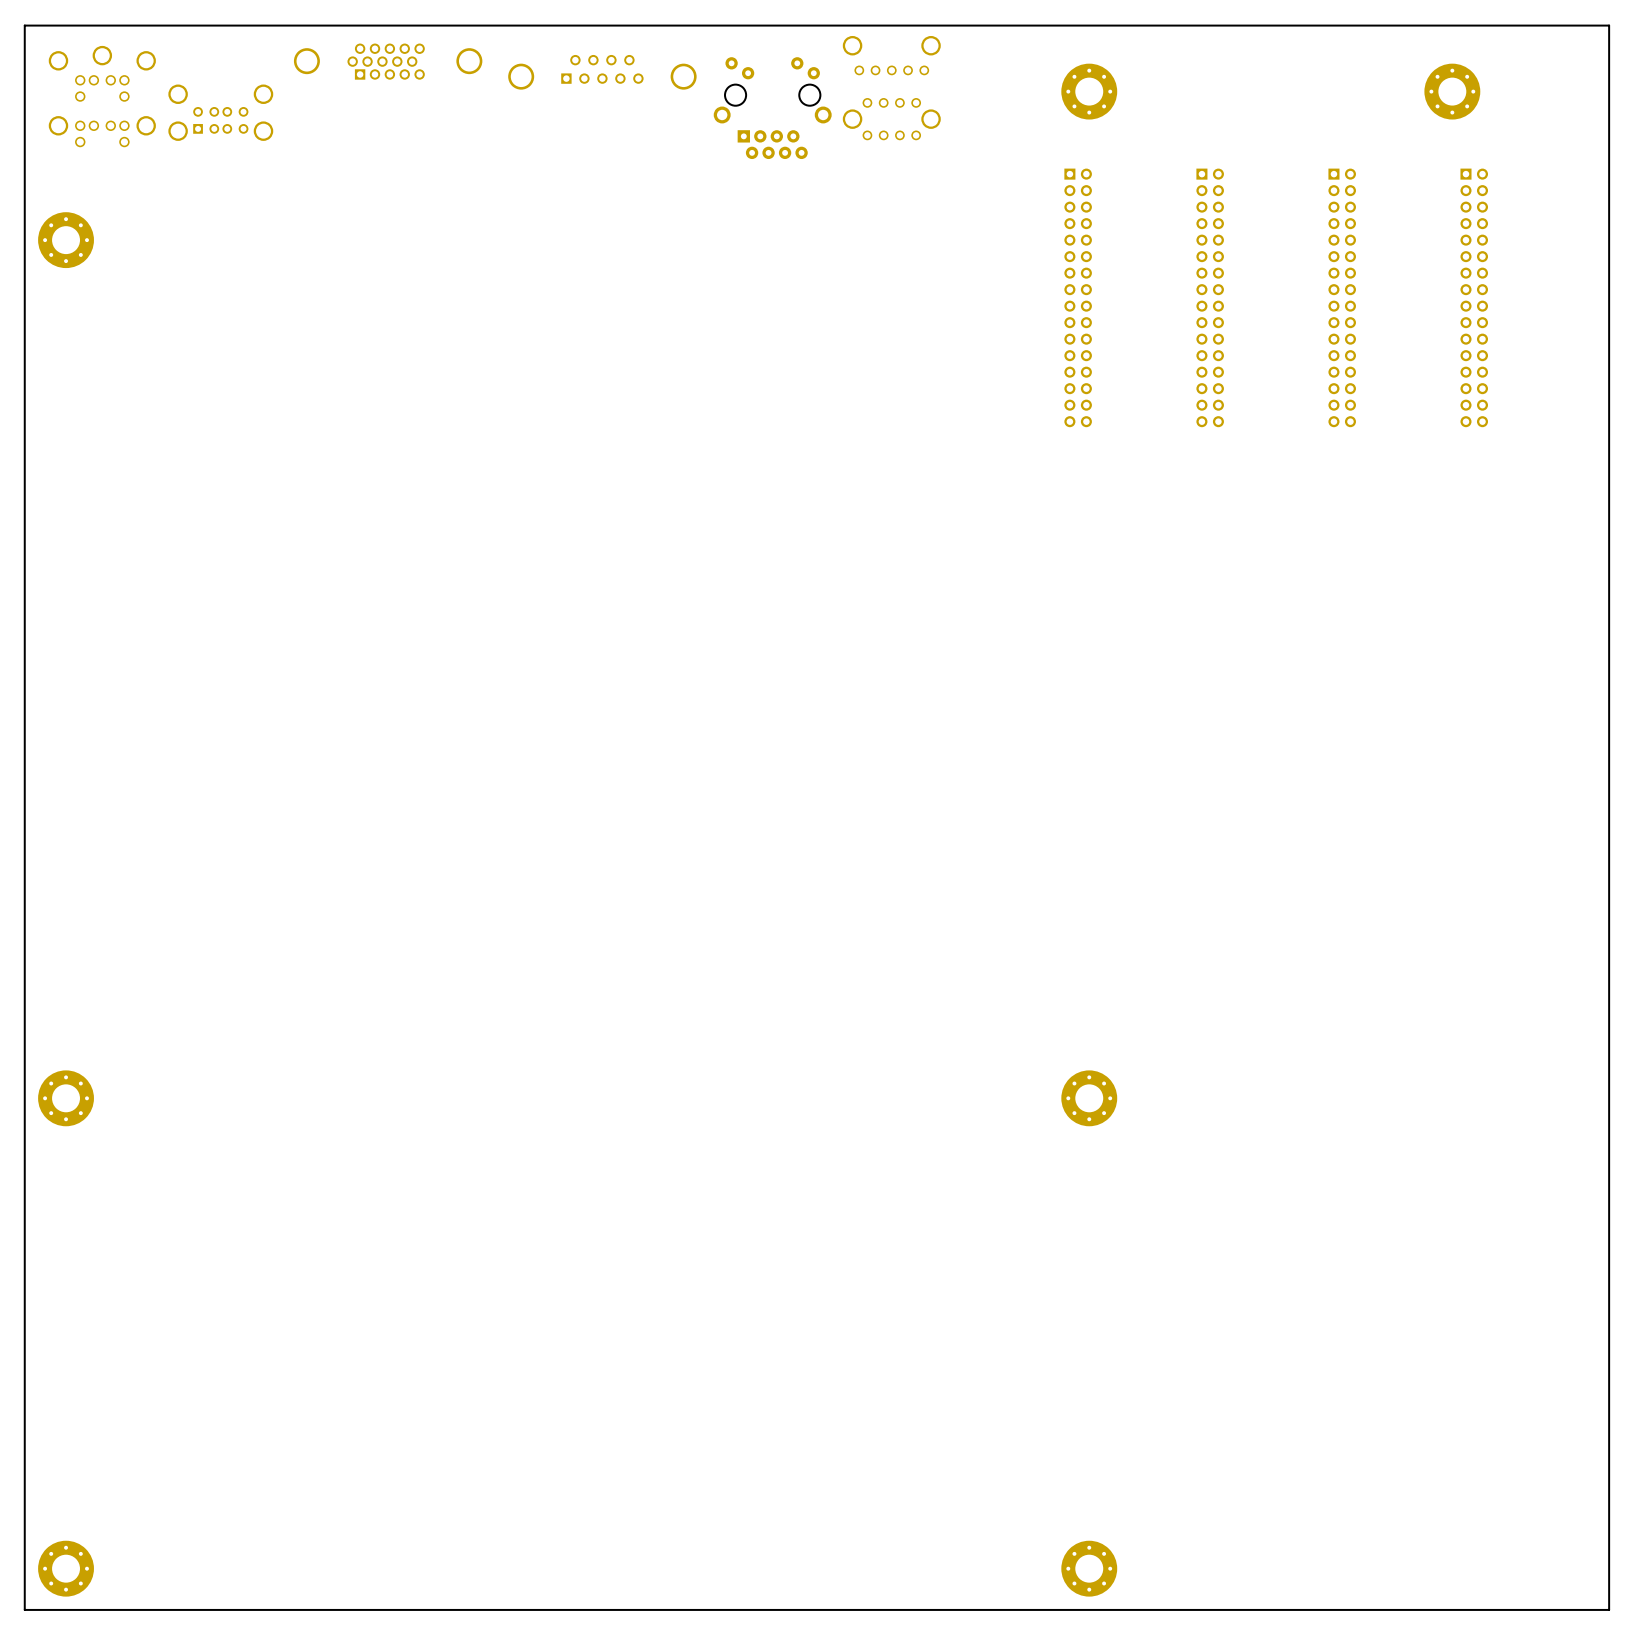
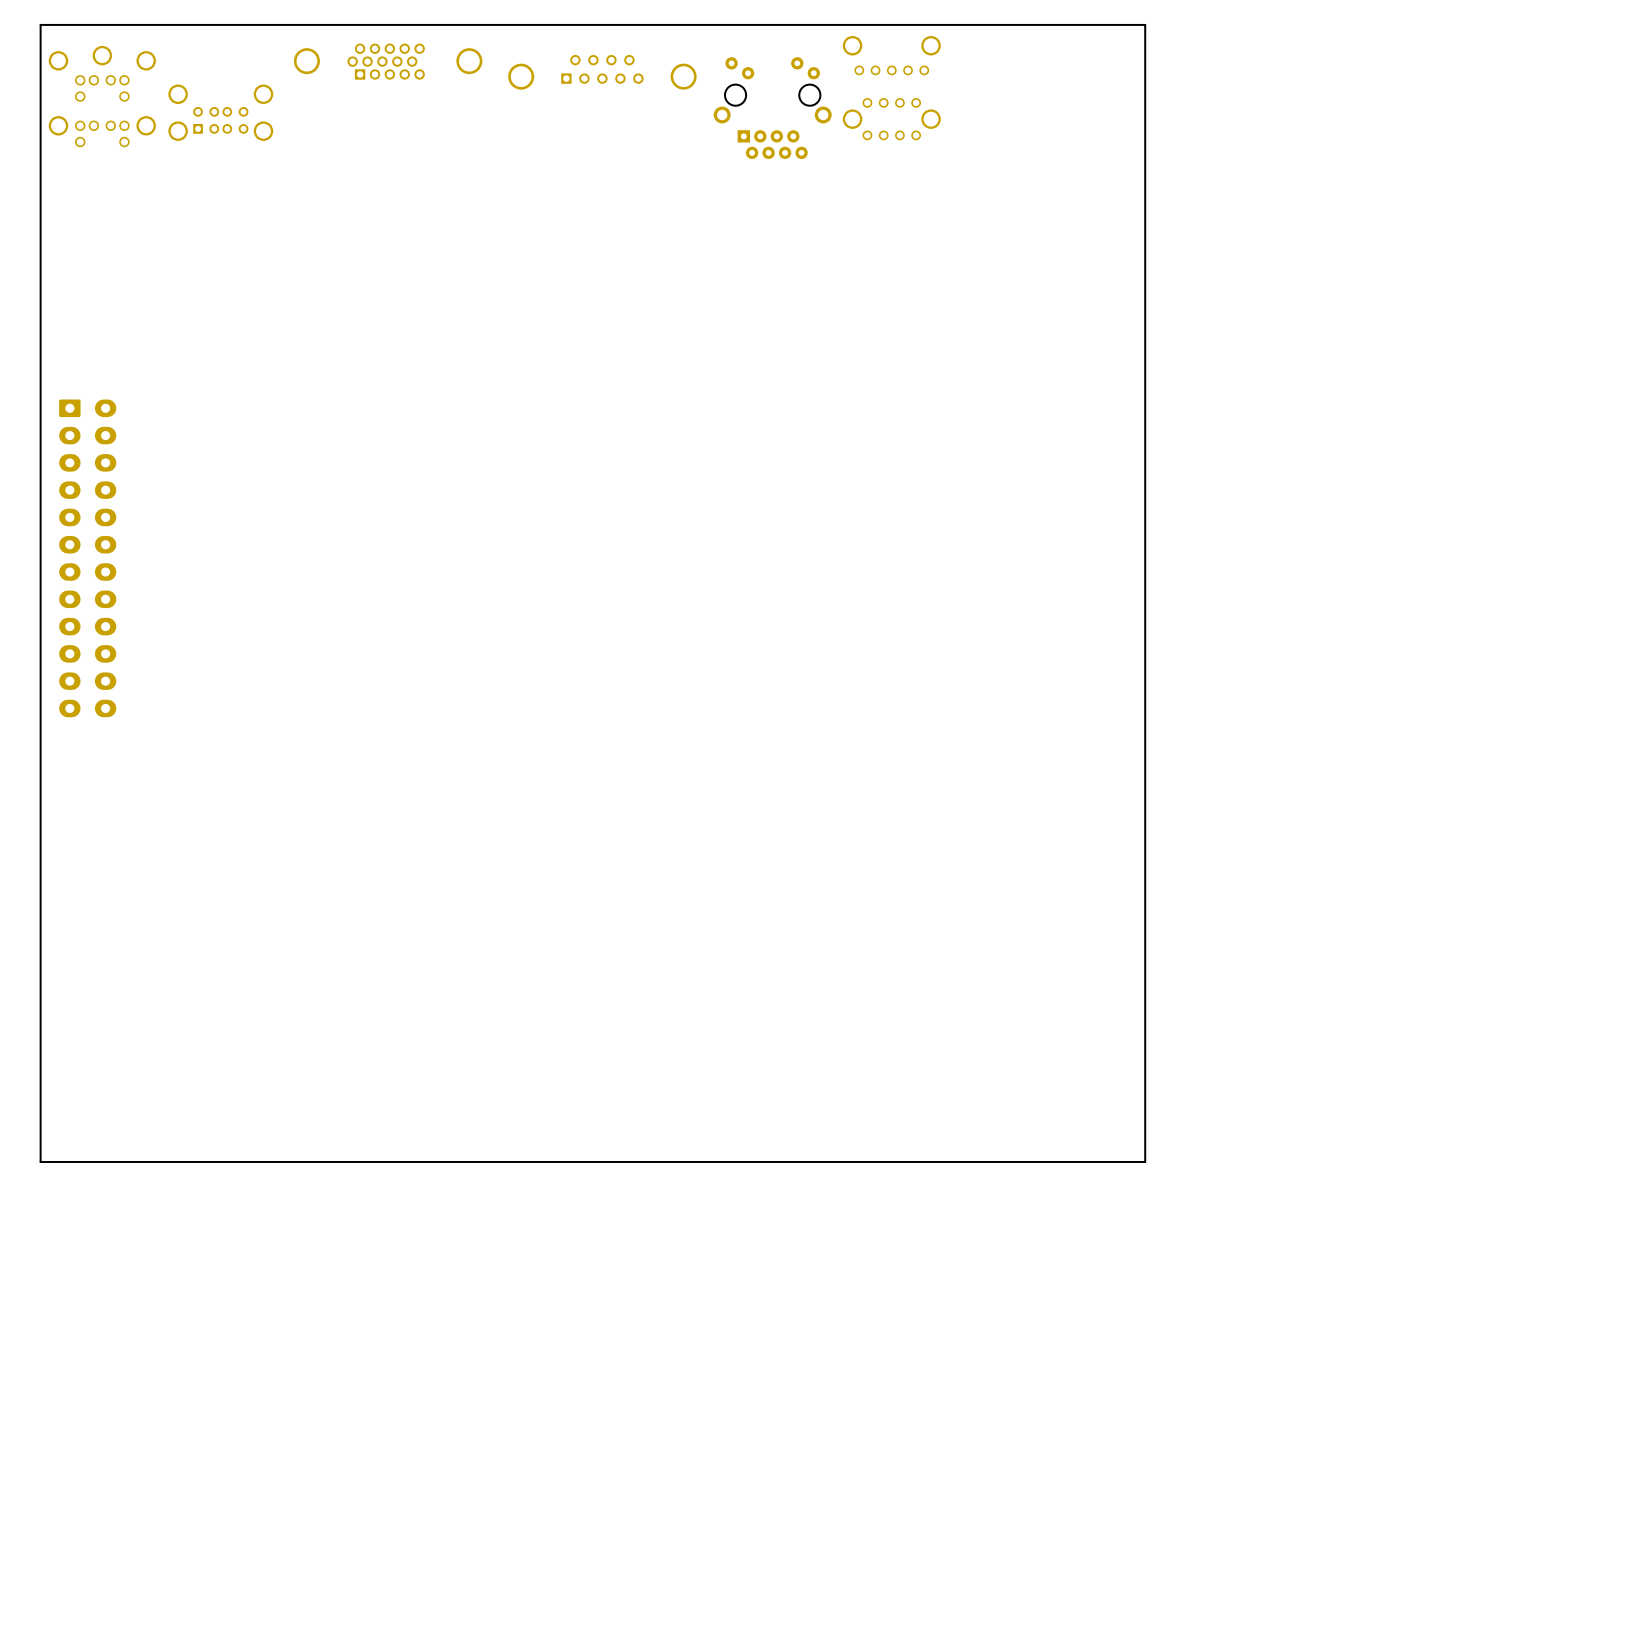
board edge: (1609, 25) (1609, 1609) (24, 1609) (24, 25) (1609, 25) -> (1145, 24) (1145, 1162) (40, 1162) (40, 24) (1145, 24)
part: (1089, 91) -> none
part: (1452, 91) -> none
part: (66, 240) -> none
part: (1078, 297) -> none
part: (1210, 297) -> none
part: (1342, 297) -> none
part: (1474, 297) -> none
part: none -> (87, 558)
part: (66, 1098) -> none
part: (1089, 1098) -> none
part: (66, 1568) -> none
part: (1089, 1568) -> none

